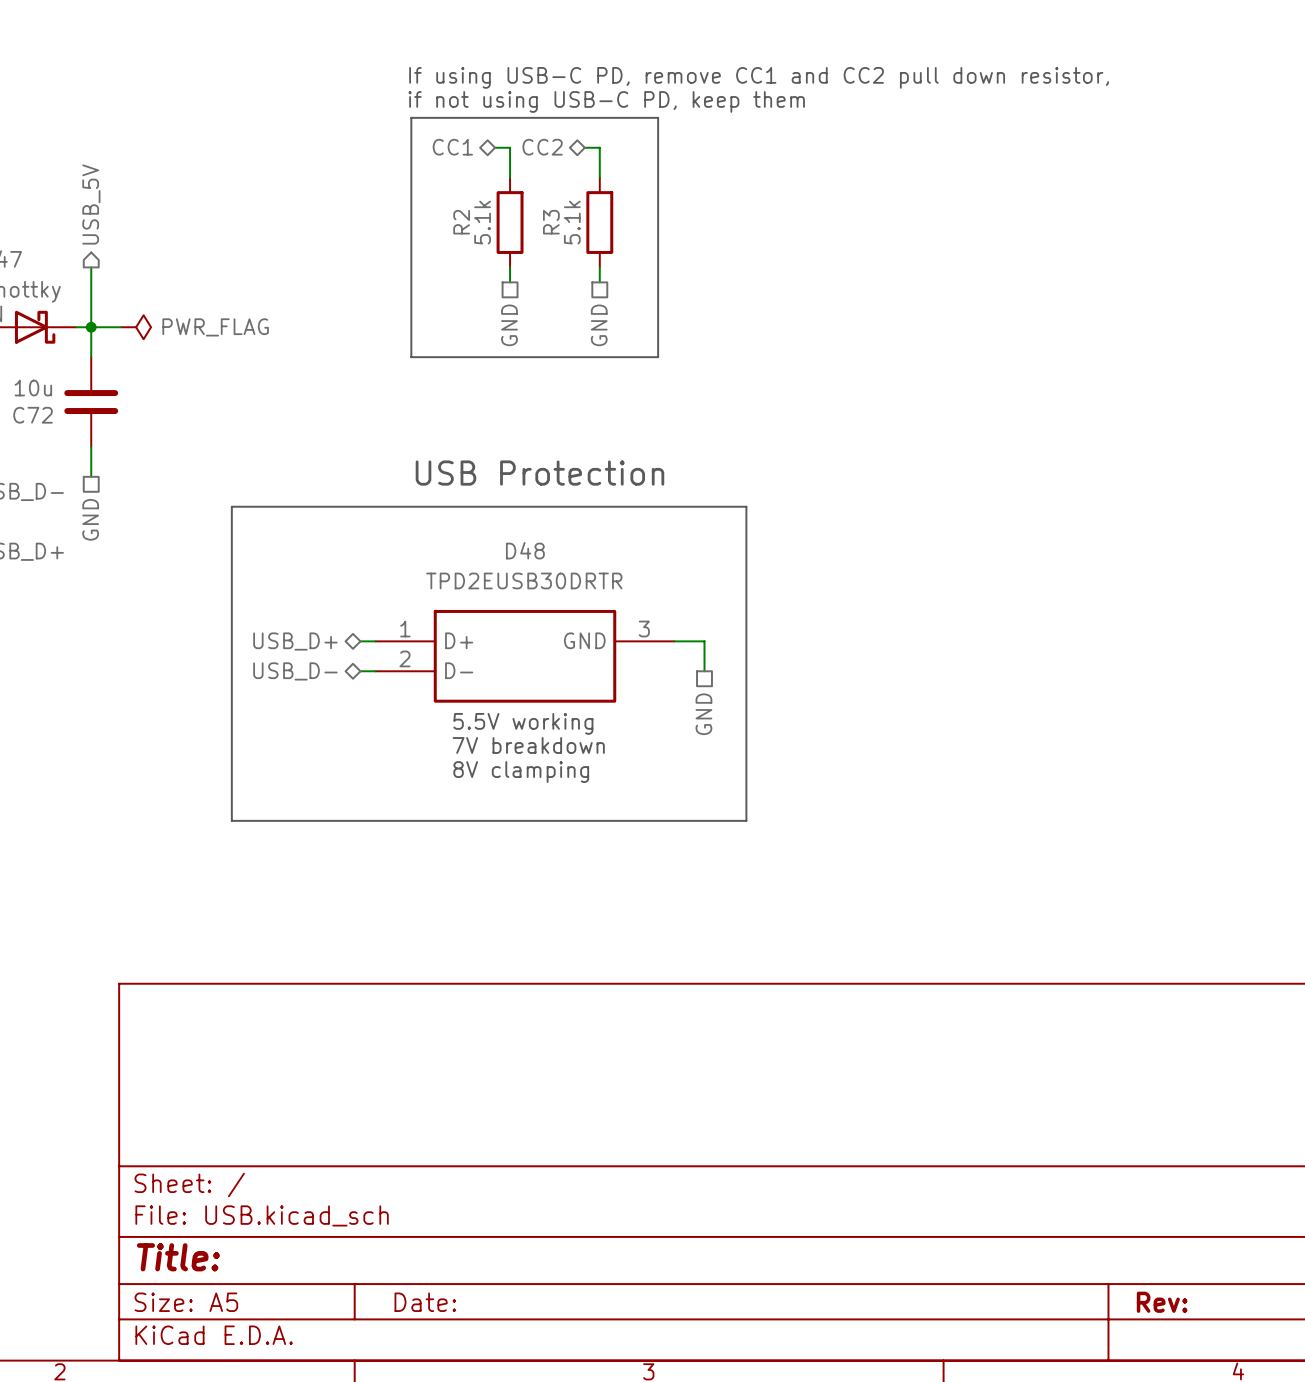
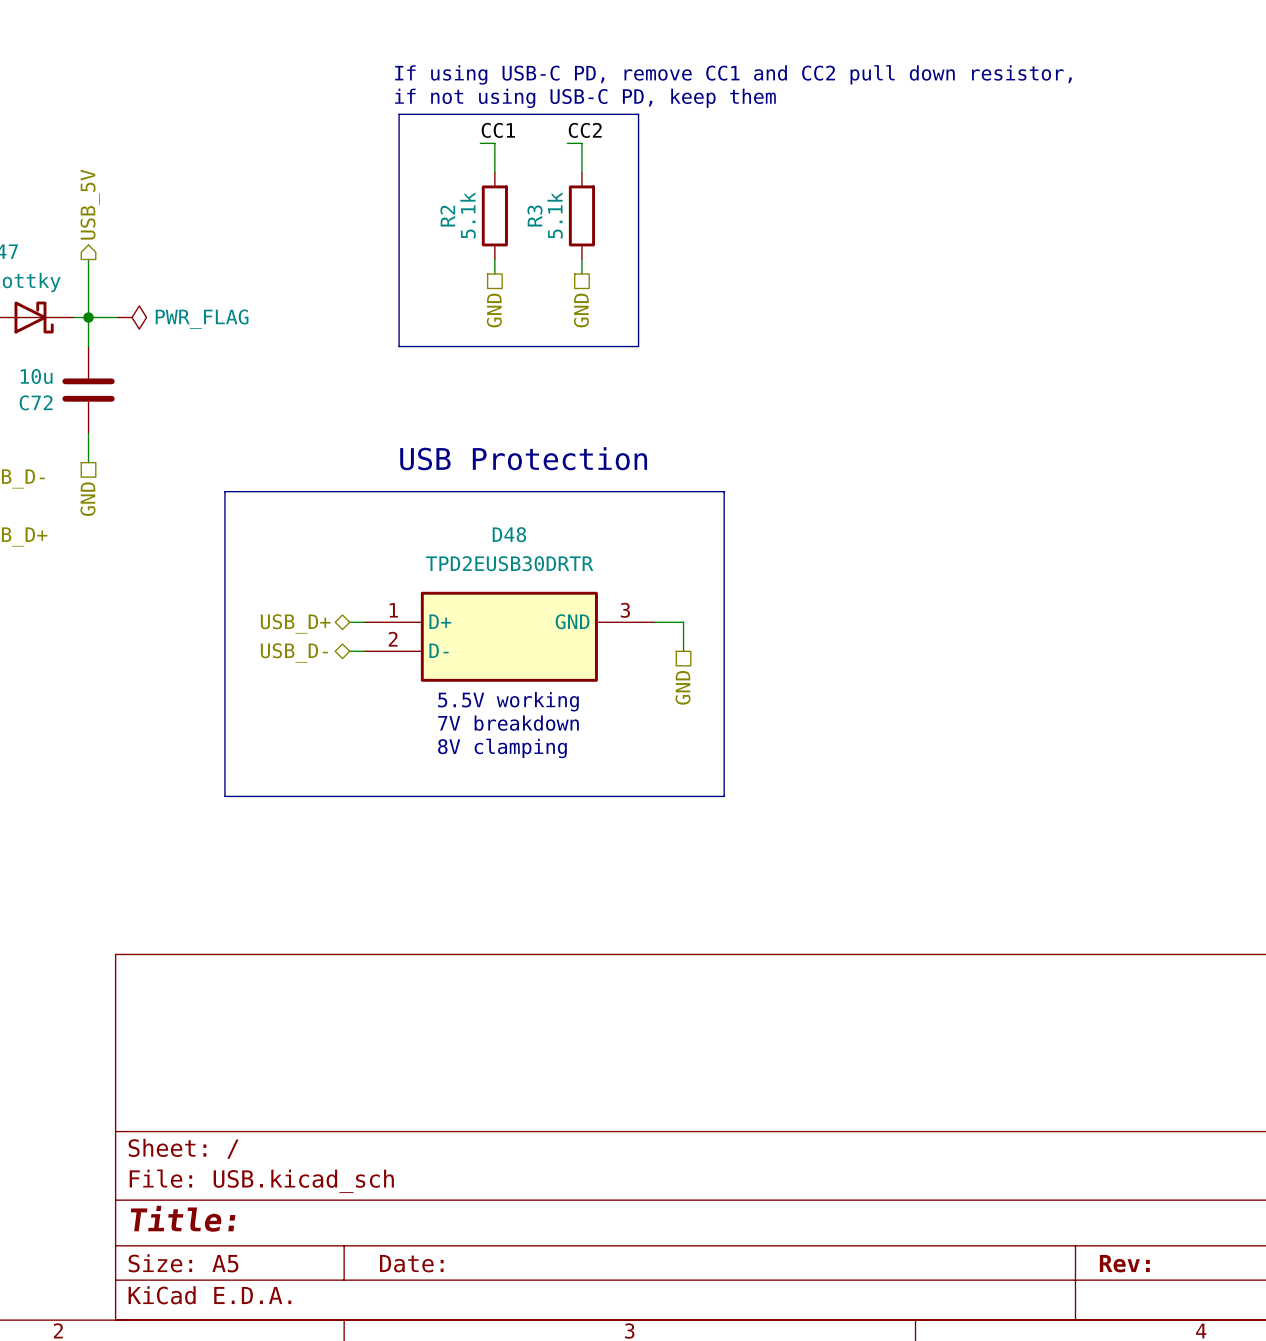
label: none -> CC1 (498, 130)
label: none -> CC2 (585, 130)
hierarchical label: CC1 (452, 147) -> none
hierarchical label: CC2 (542, 147) -> none

